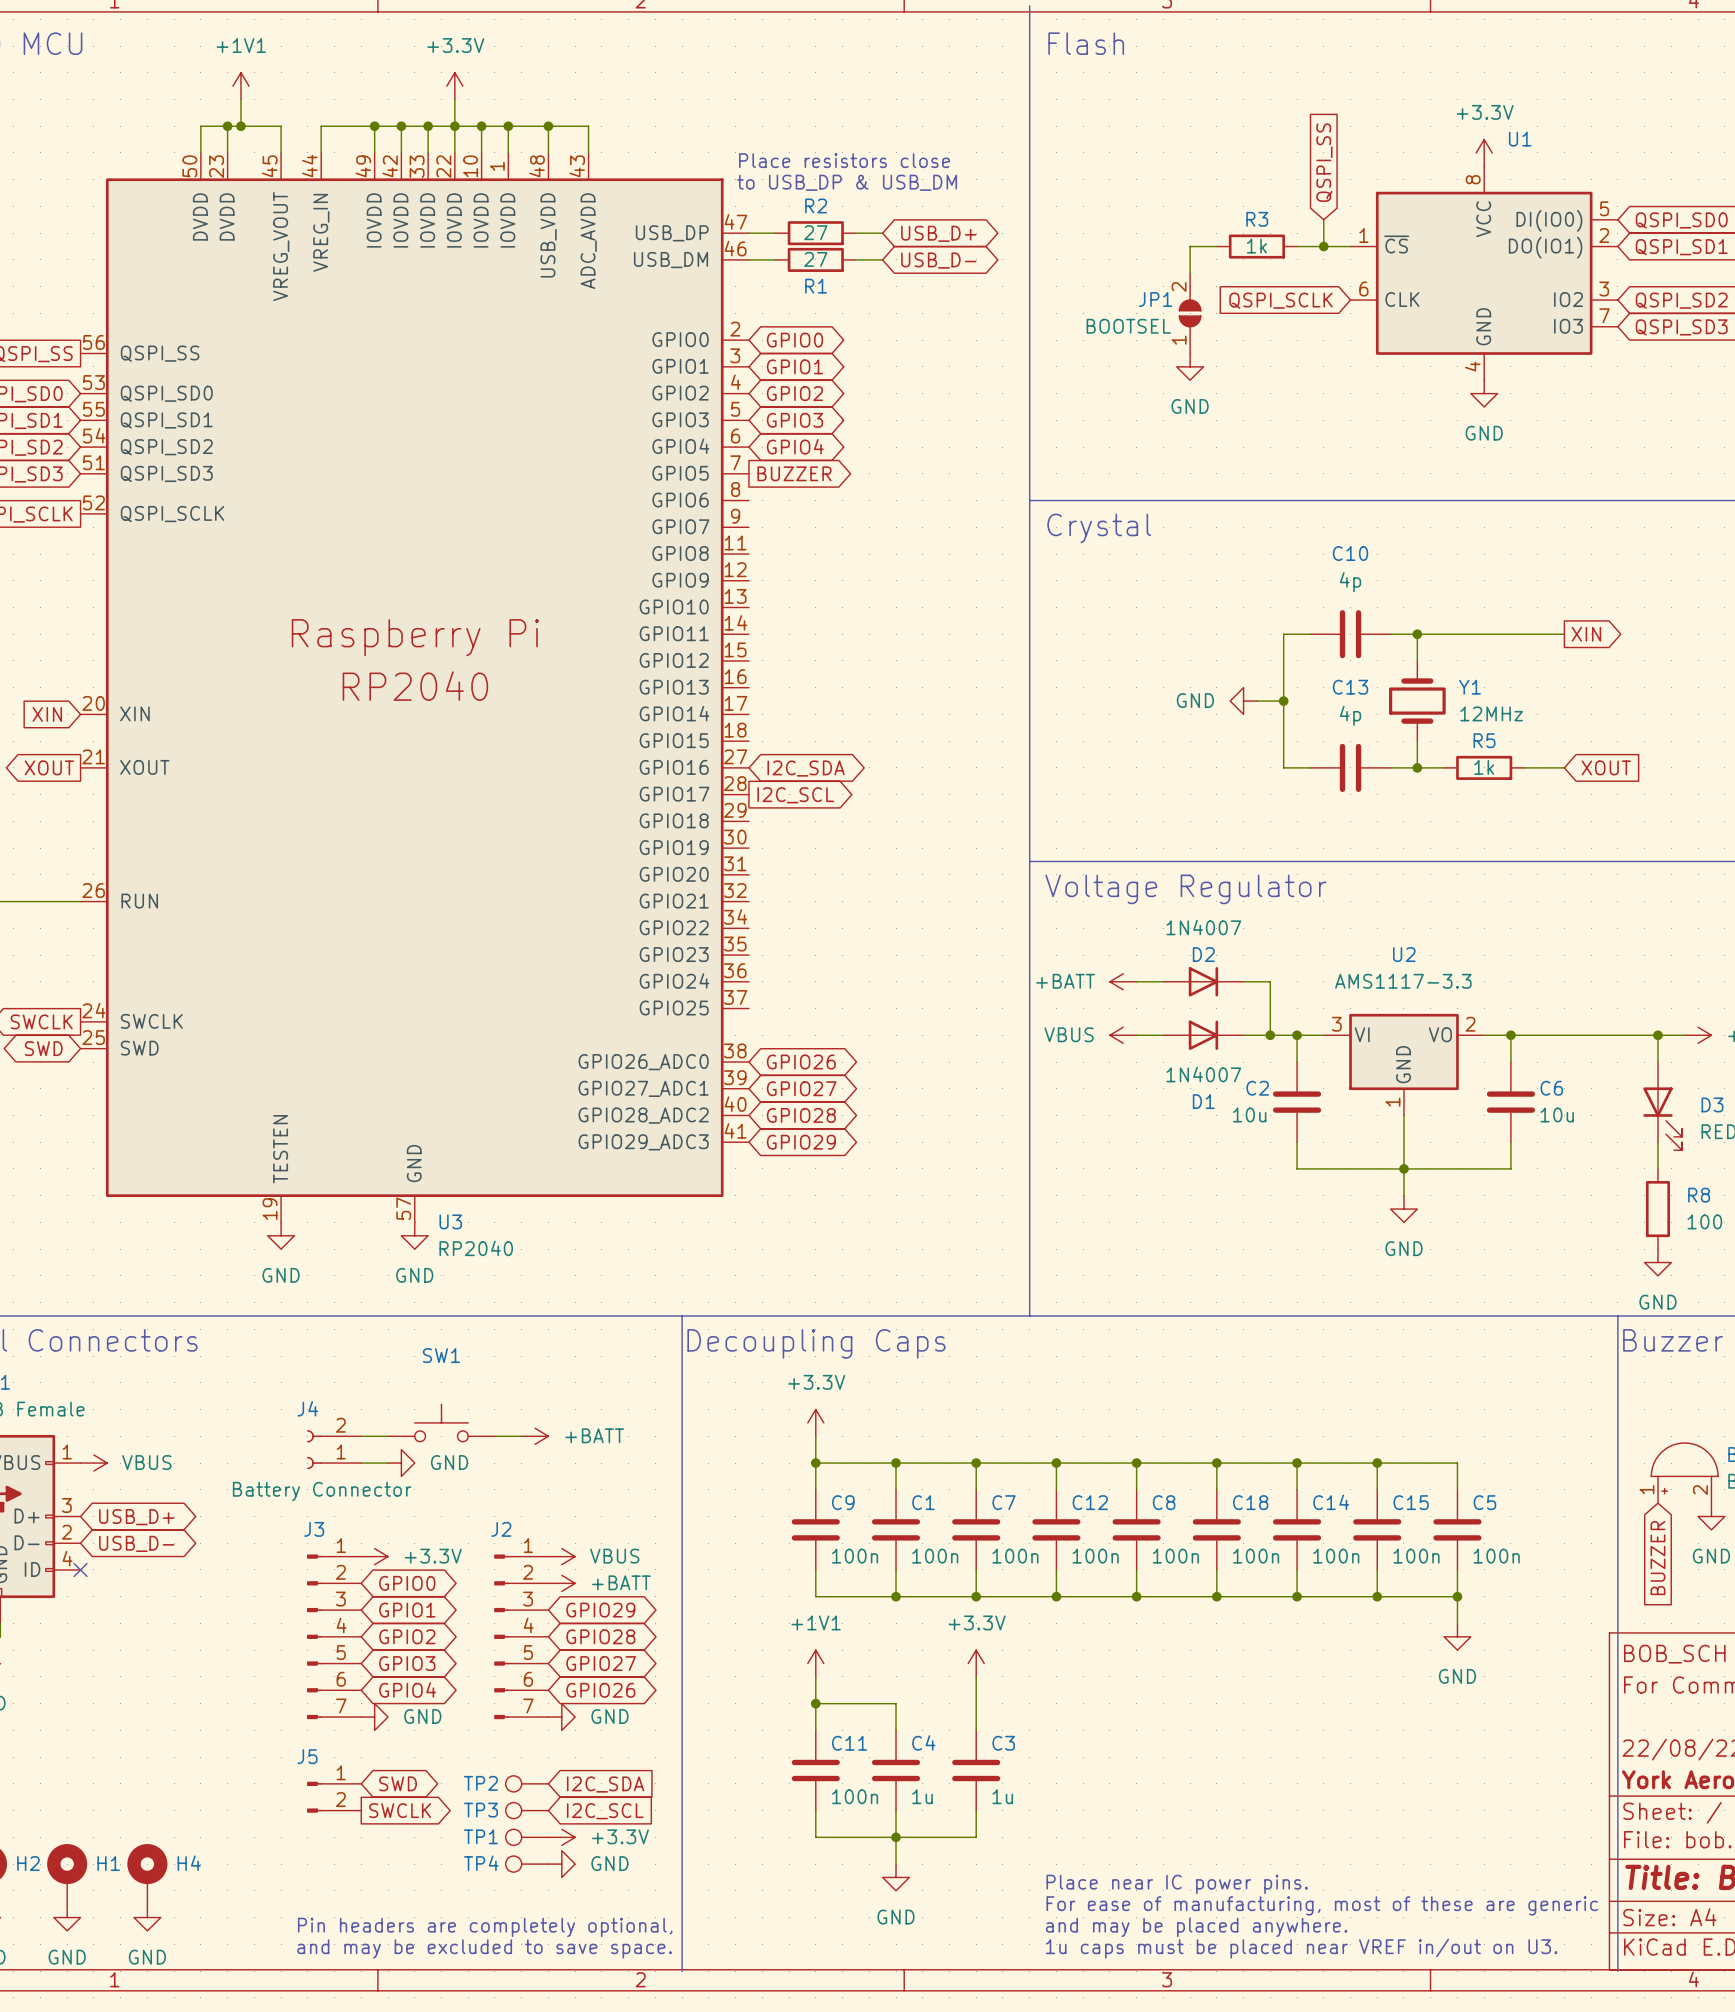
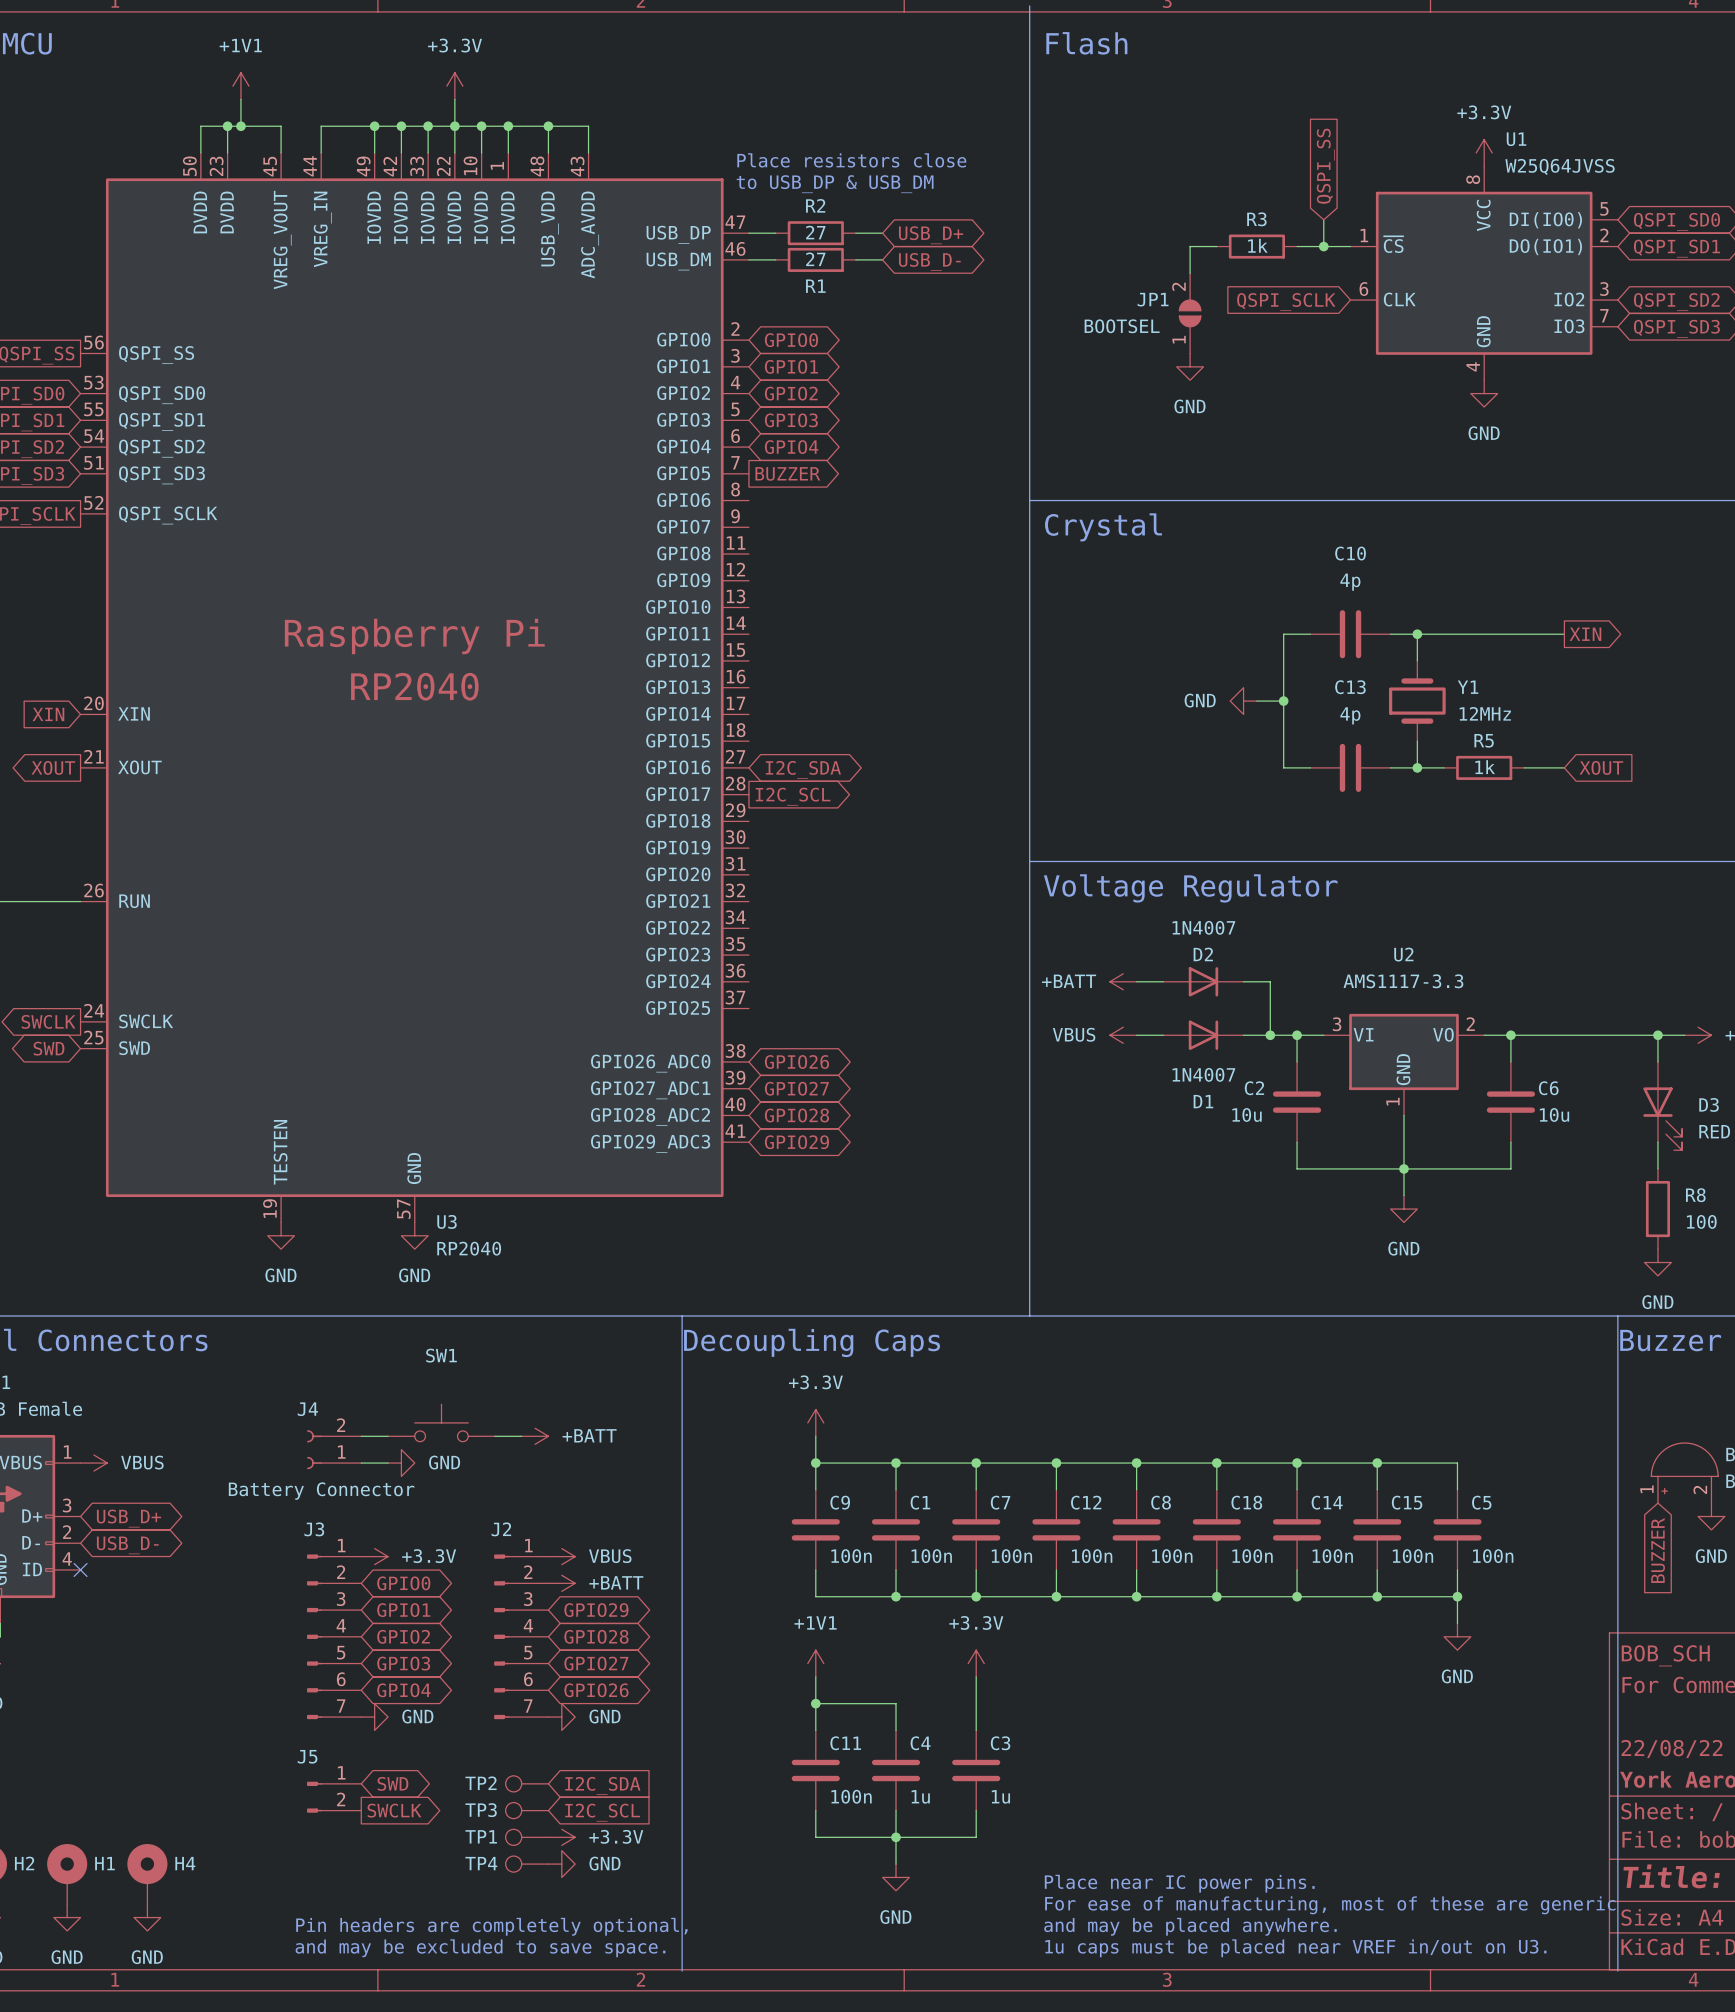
U1 value: none -> W25Q64JVSS (1560, 166)

